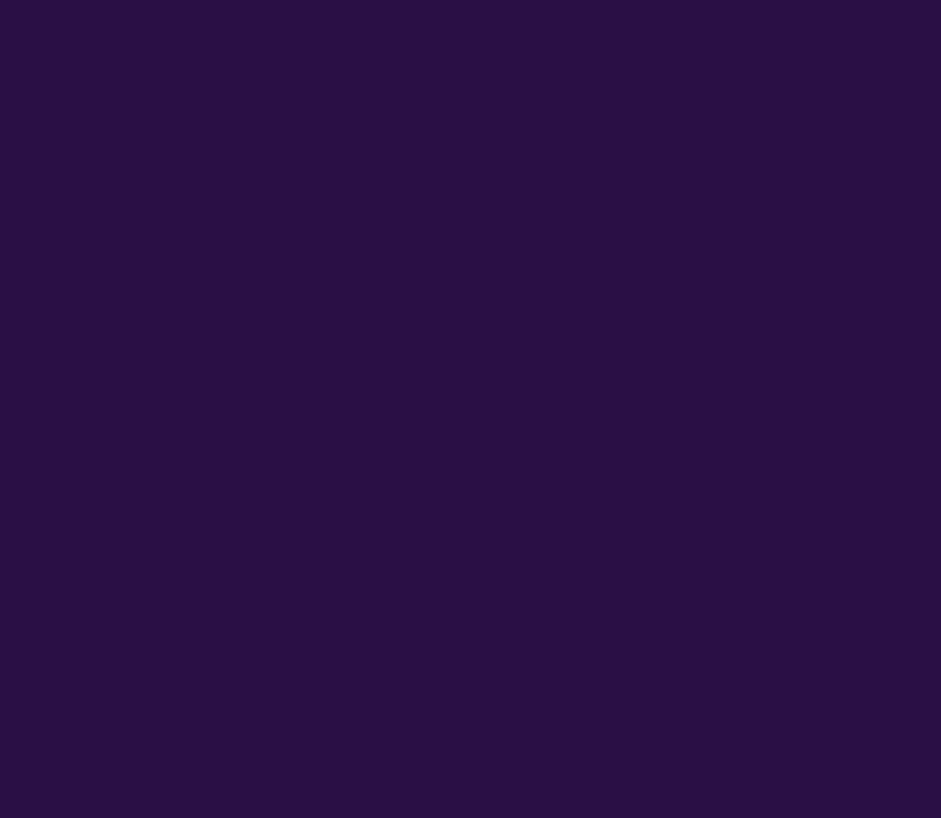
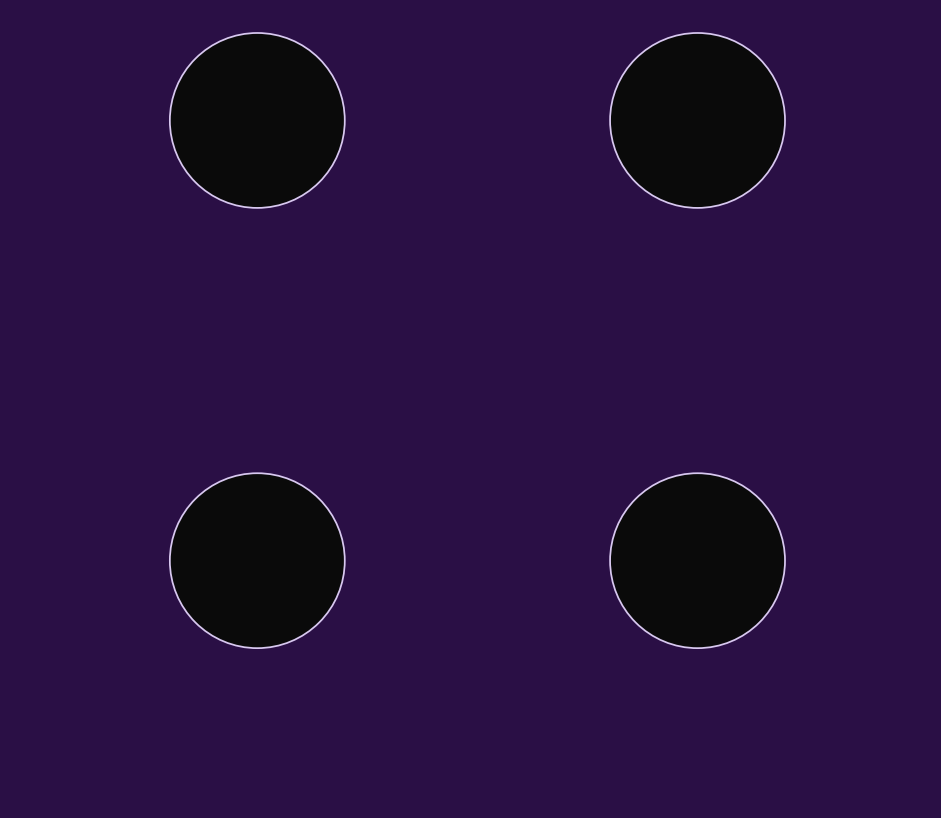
part: none -> (257, 120)
part: none -> (697, 120)
part: none -> (257, 560)
part: none -> (697, 560)

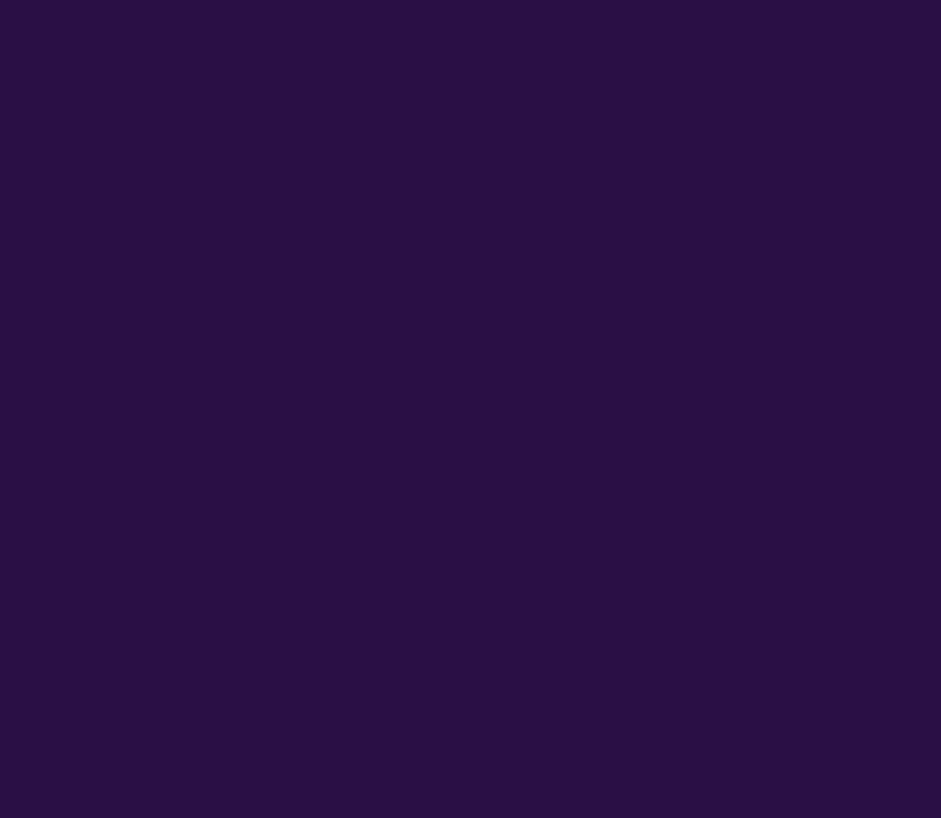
part: (257, 120) -> none
part: (697, 120) -> none
part: (257, 560) -> none
part: (697, 560) -> none

